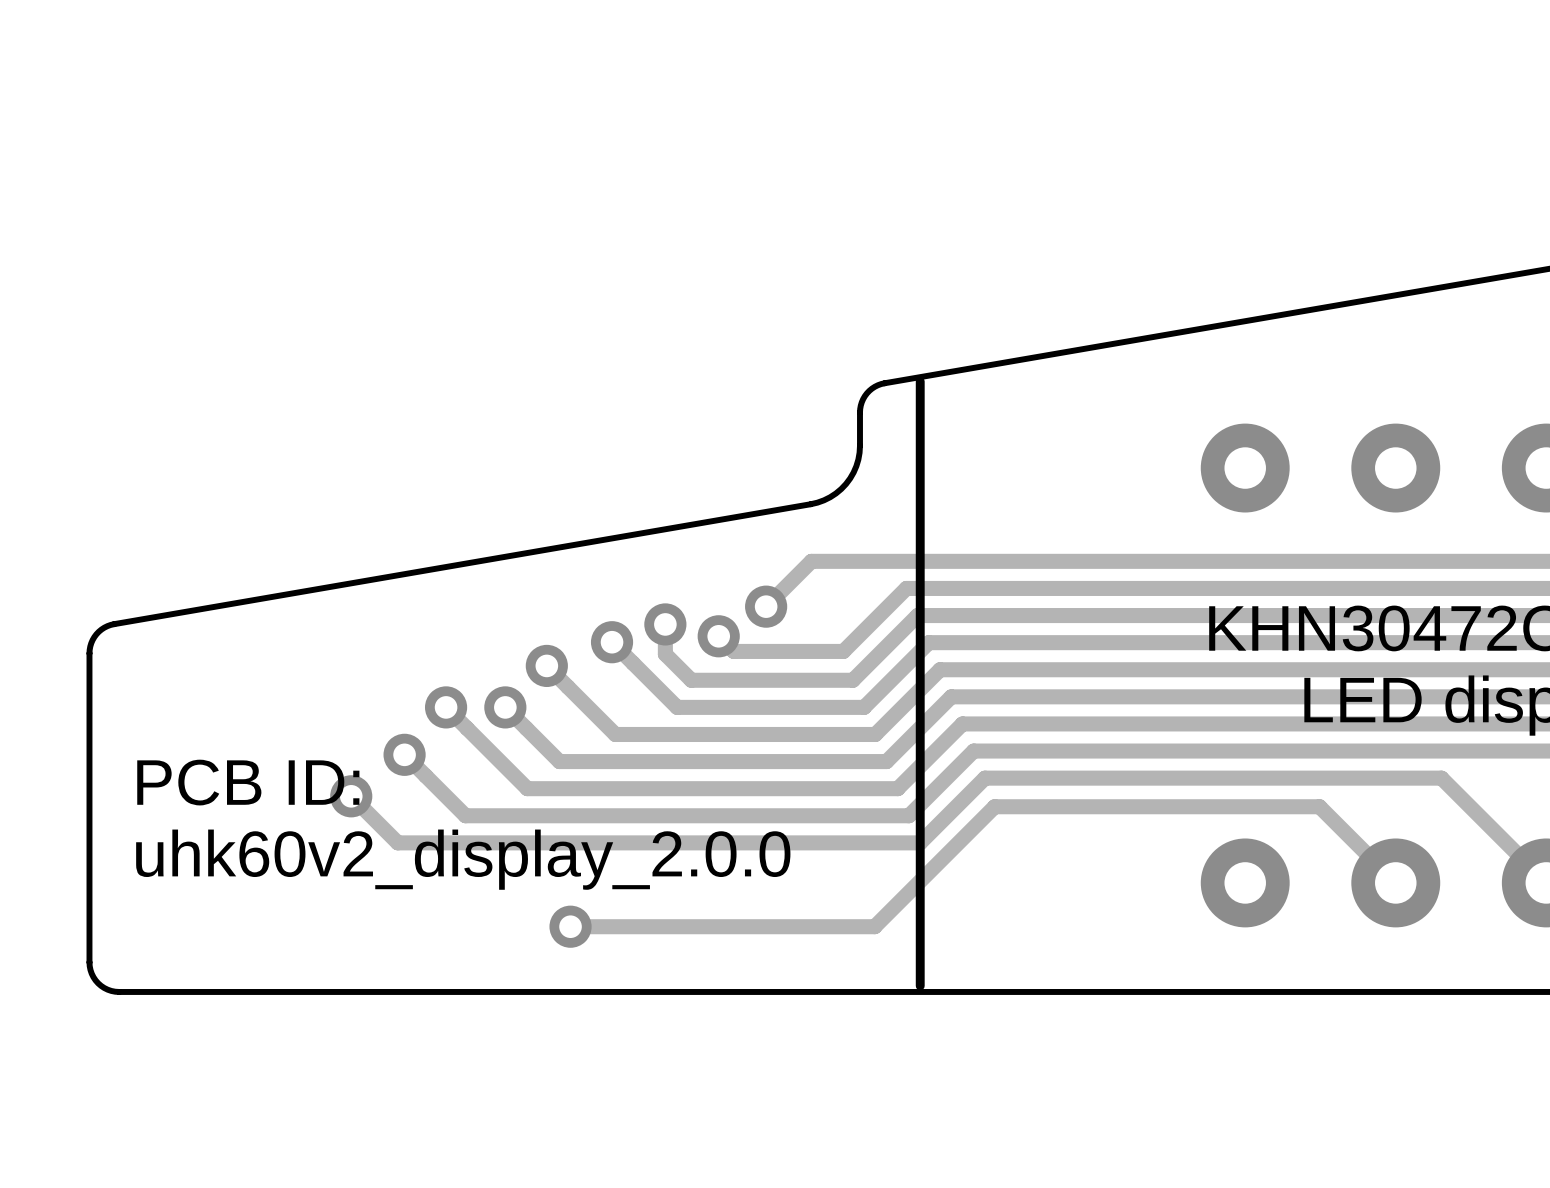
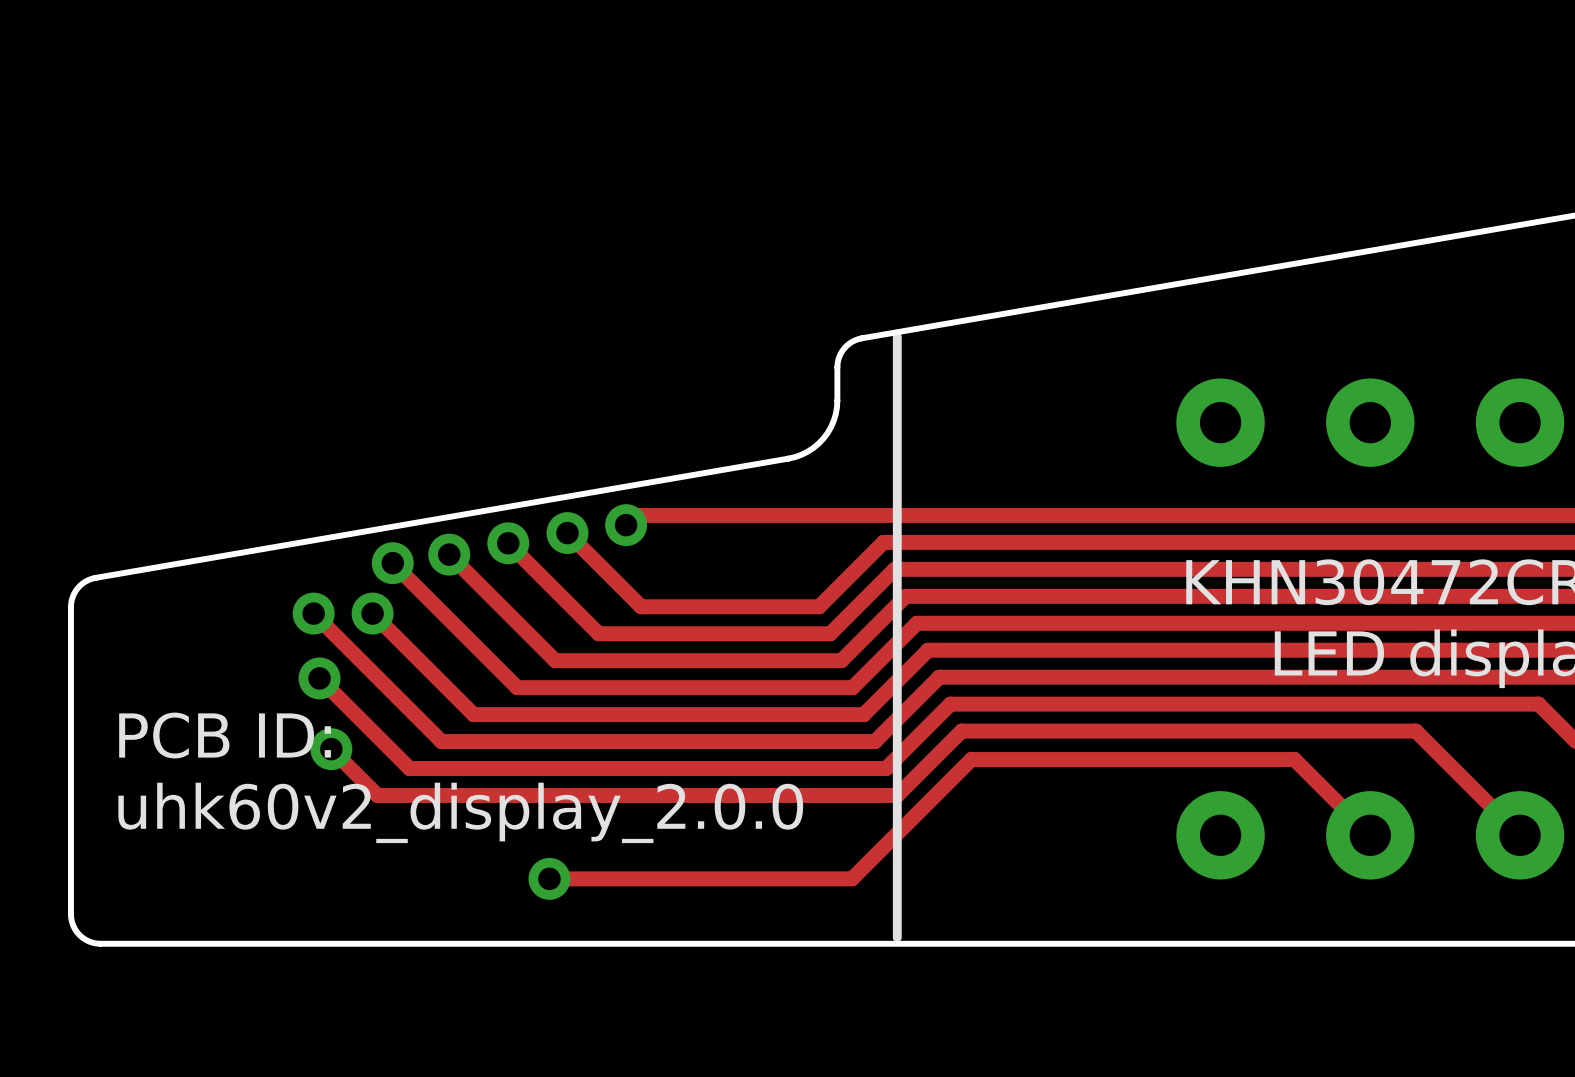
track: (811, 561) (766, 606) -> (789, 515) (635, 515) (626, 525)
via: none -> (626, 525)
via: none -> (567, 533)
via: none -> (508, 543)
via: none -> (449, 554)
via: (766, 606) -> none
via: none -> (392, 563)
track: (665, 624) (665, 654) (691, 680) -> (508, 543) (598, 633) (669, 633)
via: (665, 624) -> none
track: (718, 636) (733, 651) (843, 651) -> (567, 533) (641, 606) (819, 606) (820, 605)
via: (718, 636) -> none
track: (612, 642) (677, 707) -> (449, 554) (555, 660) (655, 660)
via: (612, 642) -> none
via: none -> (313, 613)
via: none -> (372, 613)
track: (546, 665) (615, 734) -> (392, 563) (517, 687) (594, 687)
via: (546, 665) -> none
track: (446, 707) (527, 788) -> (313, 613) (441, 741) (506, 741)
via: (446, 707) -> none
track: (505, 707) (559, 761) -> (372, 613) (473, 714) (538, 714)
via: (505, 707) -> none
via: none -> (319, 678)
track: (404, 754) (465, 815) -> (319, 678) (409, 768) (445, 768)
via: (404, 754) -> none

